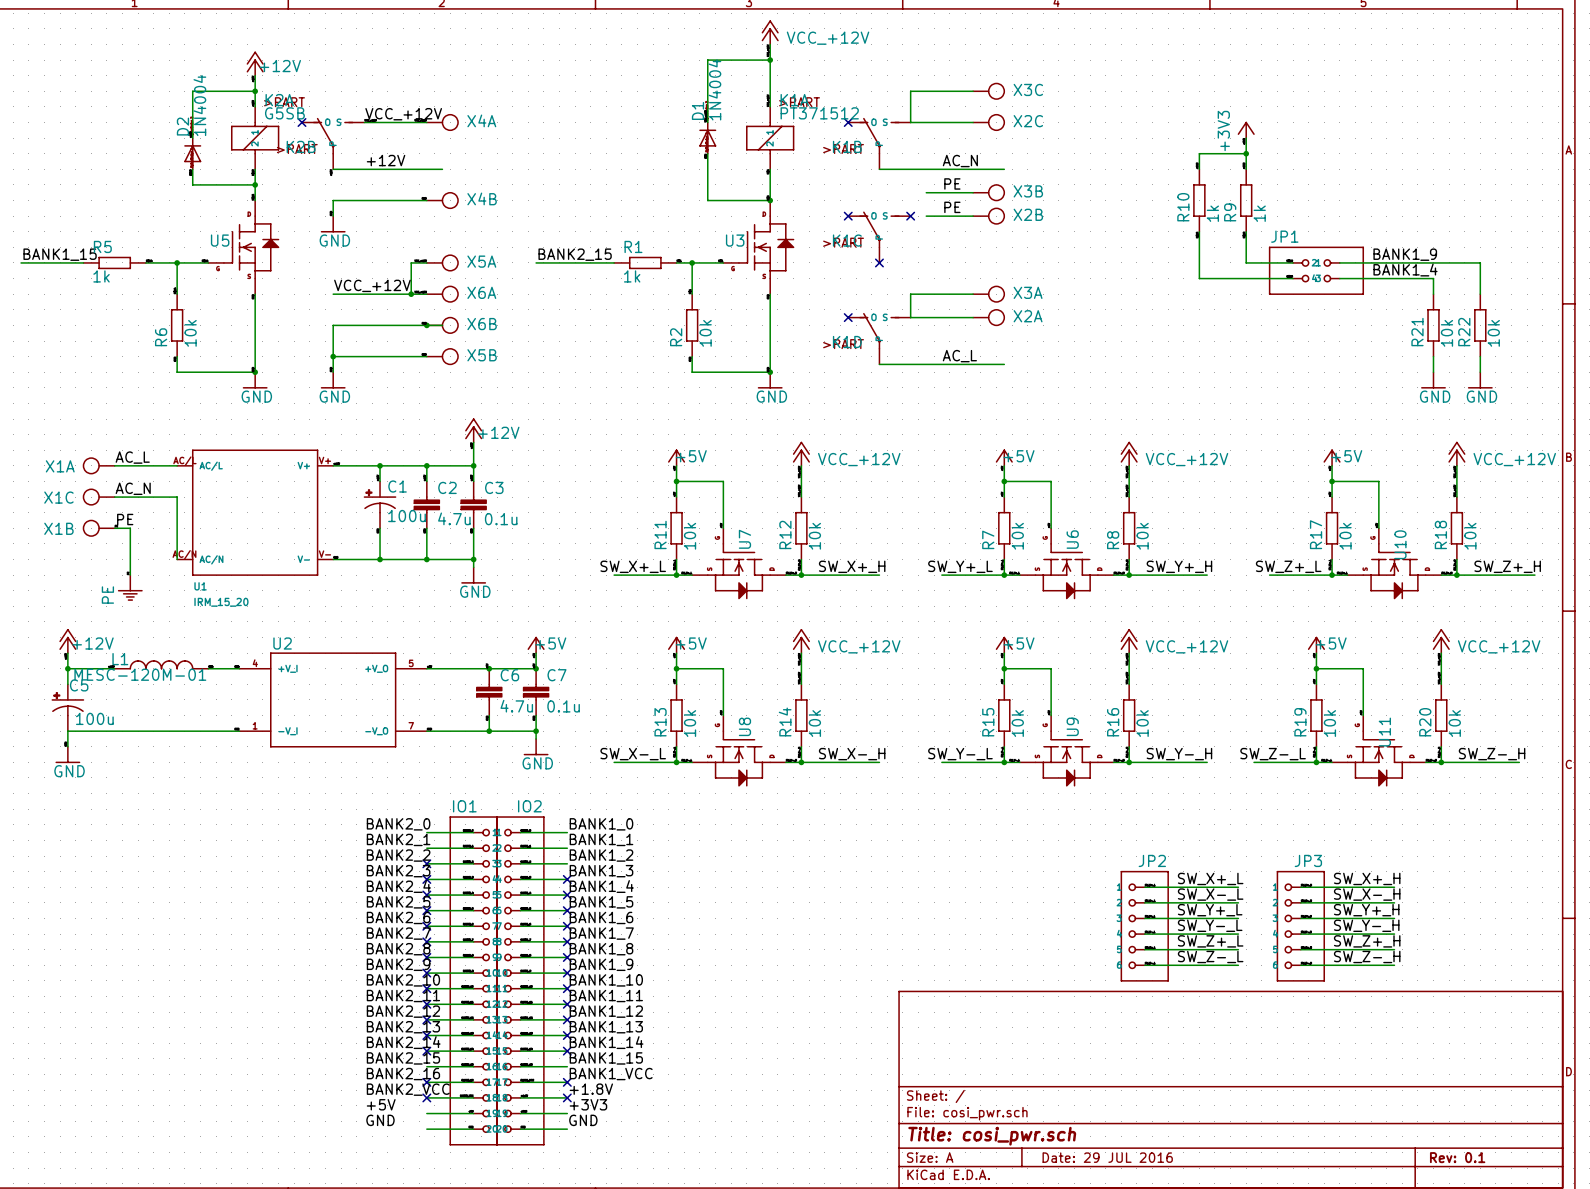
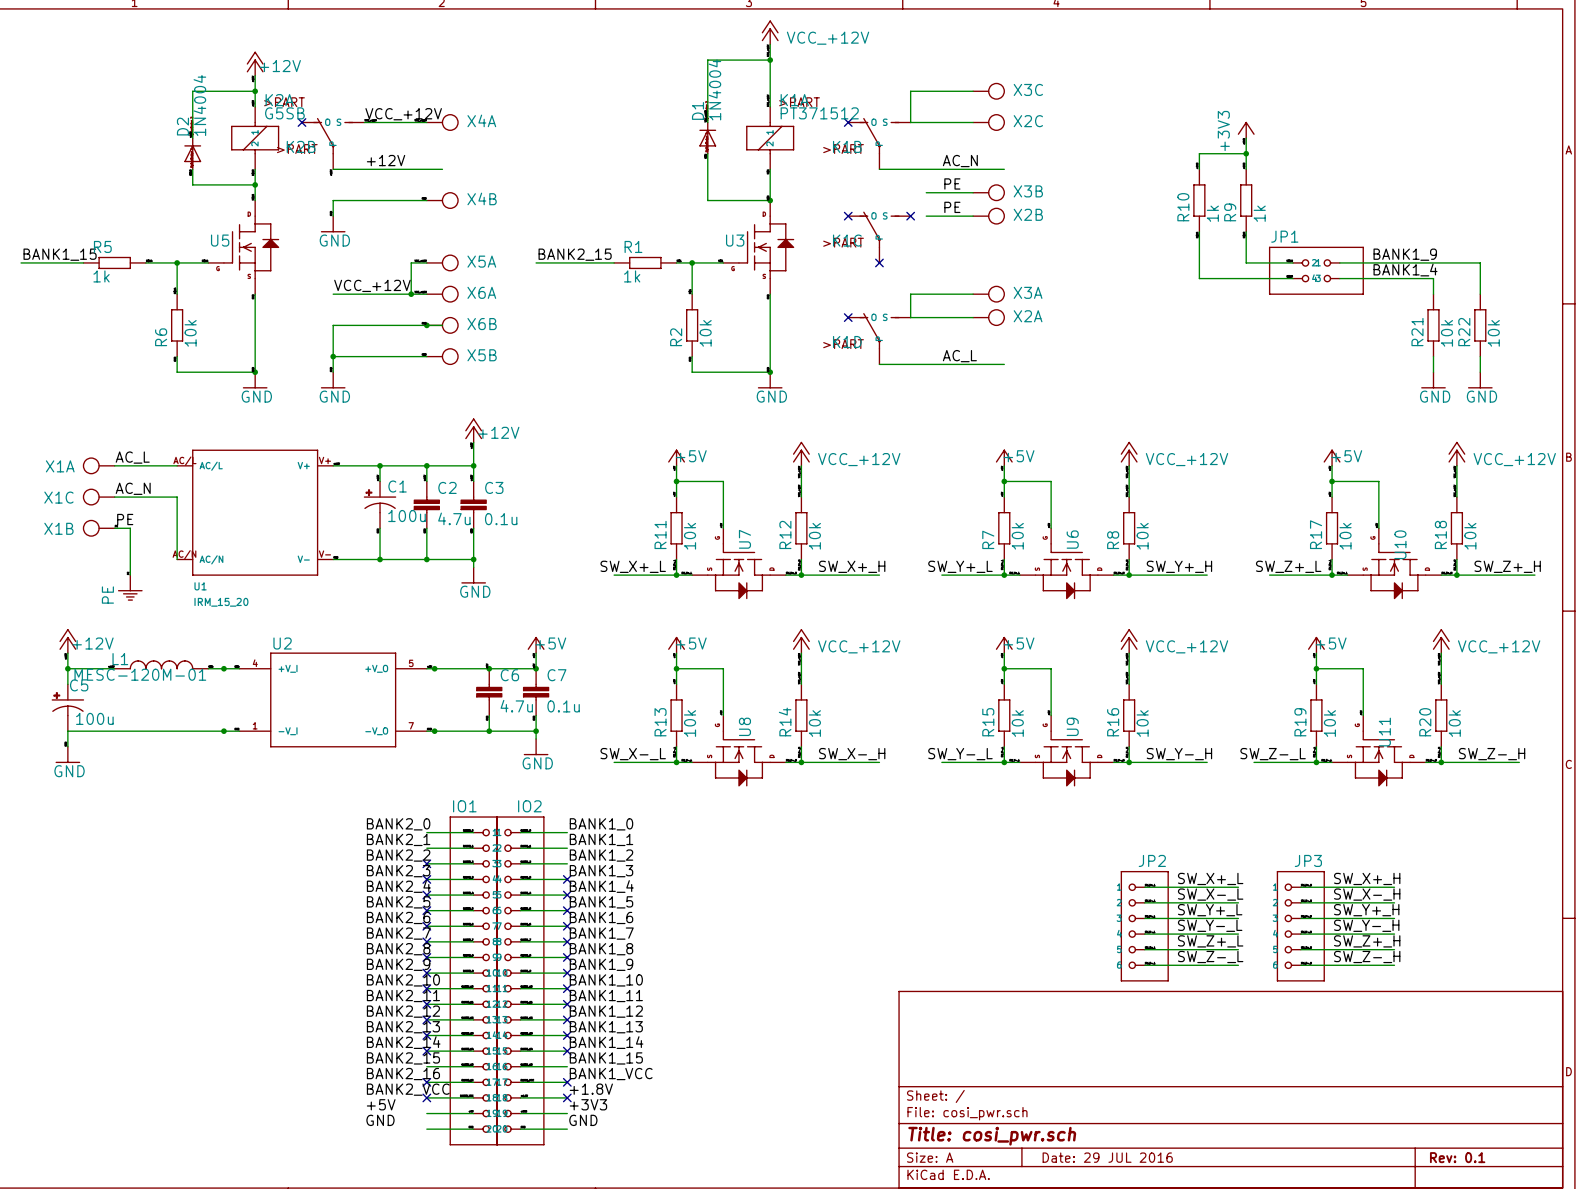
junction: none -> (223, 668)
junction: none -> (434, 668)
junction: none -> (223, 731)
junction: none -> (434, 731)

